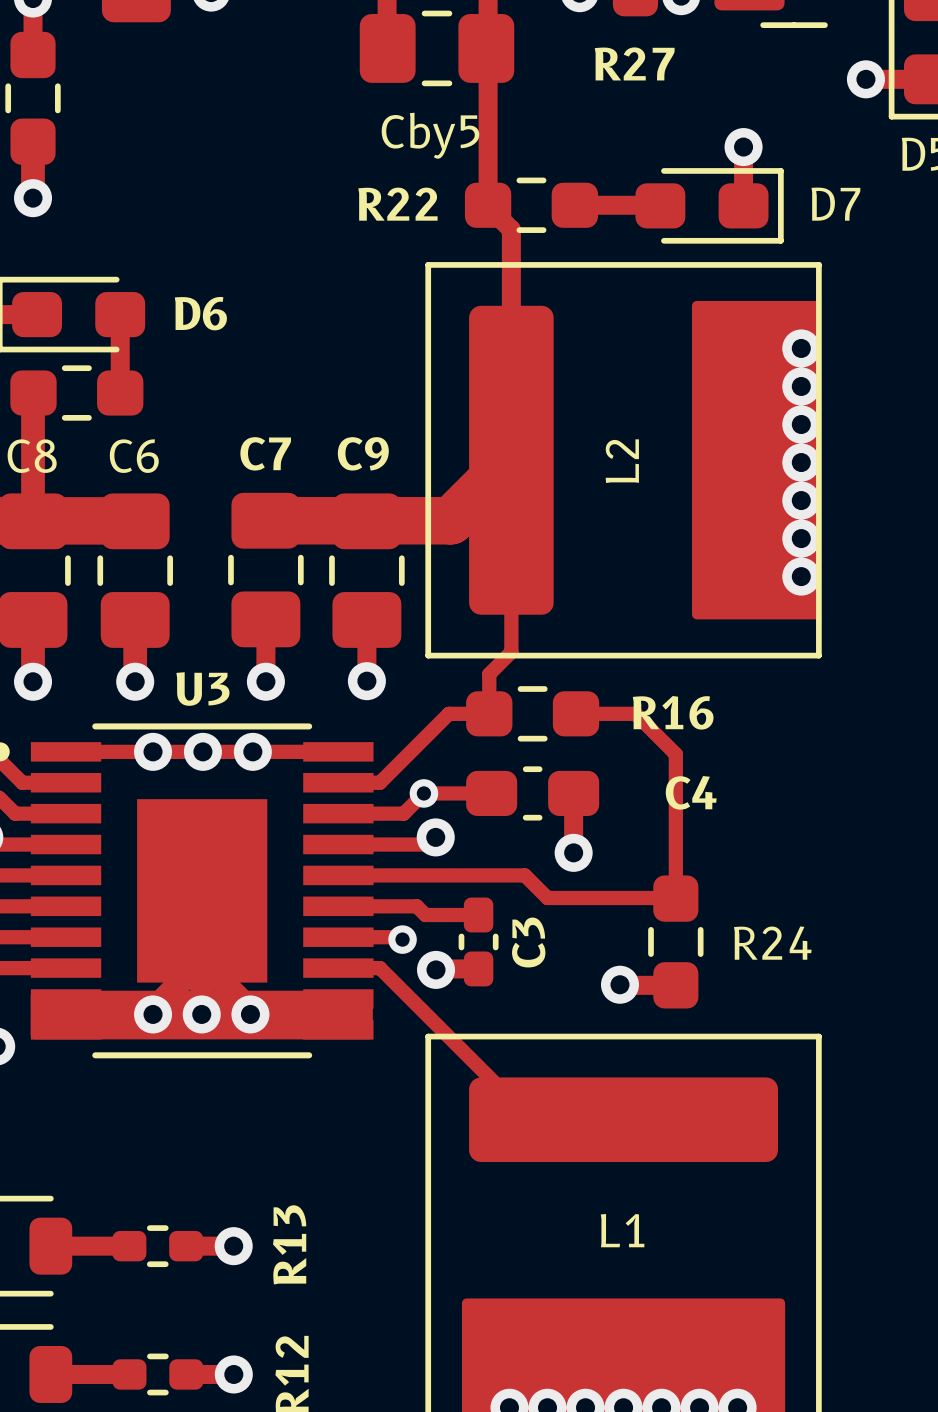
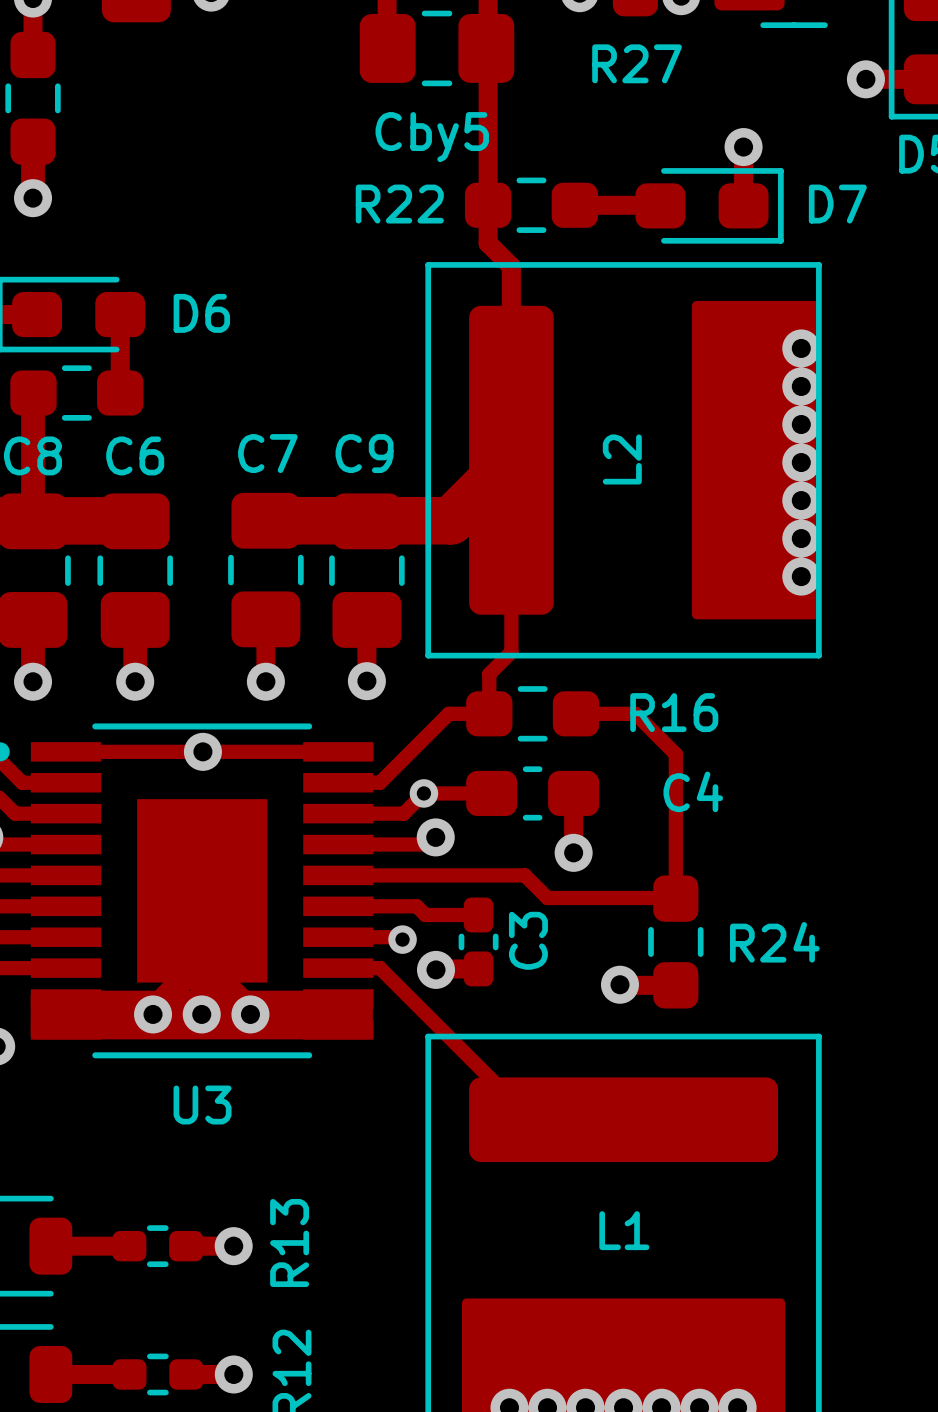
track: (488, 206) (511, 229) (511, 266) -> (488, 206) (488, 243) (511, 266)
U3 name position: U3 (202, 689) -> U3 (202, 1105)
via: (153, 751) -> none
via: (252, 751) -> none

